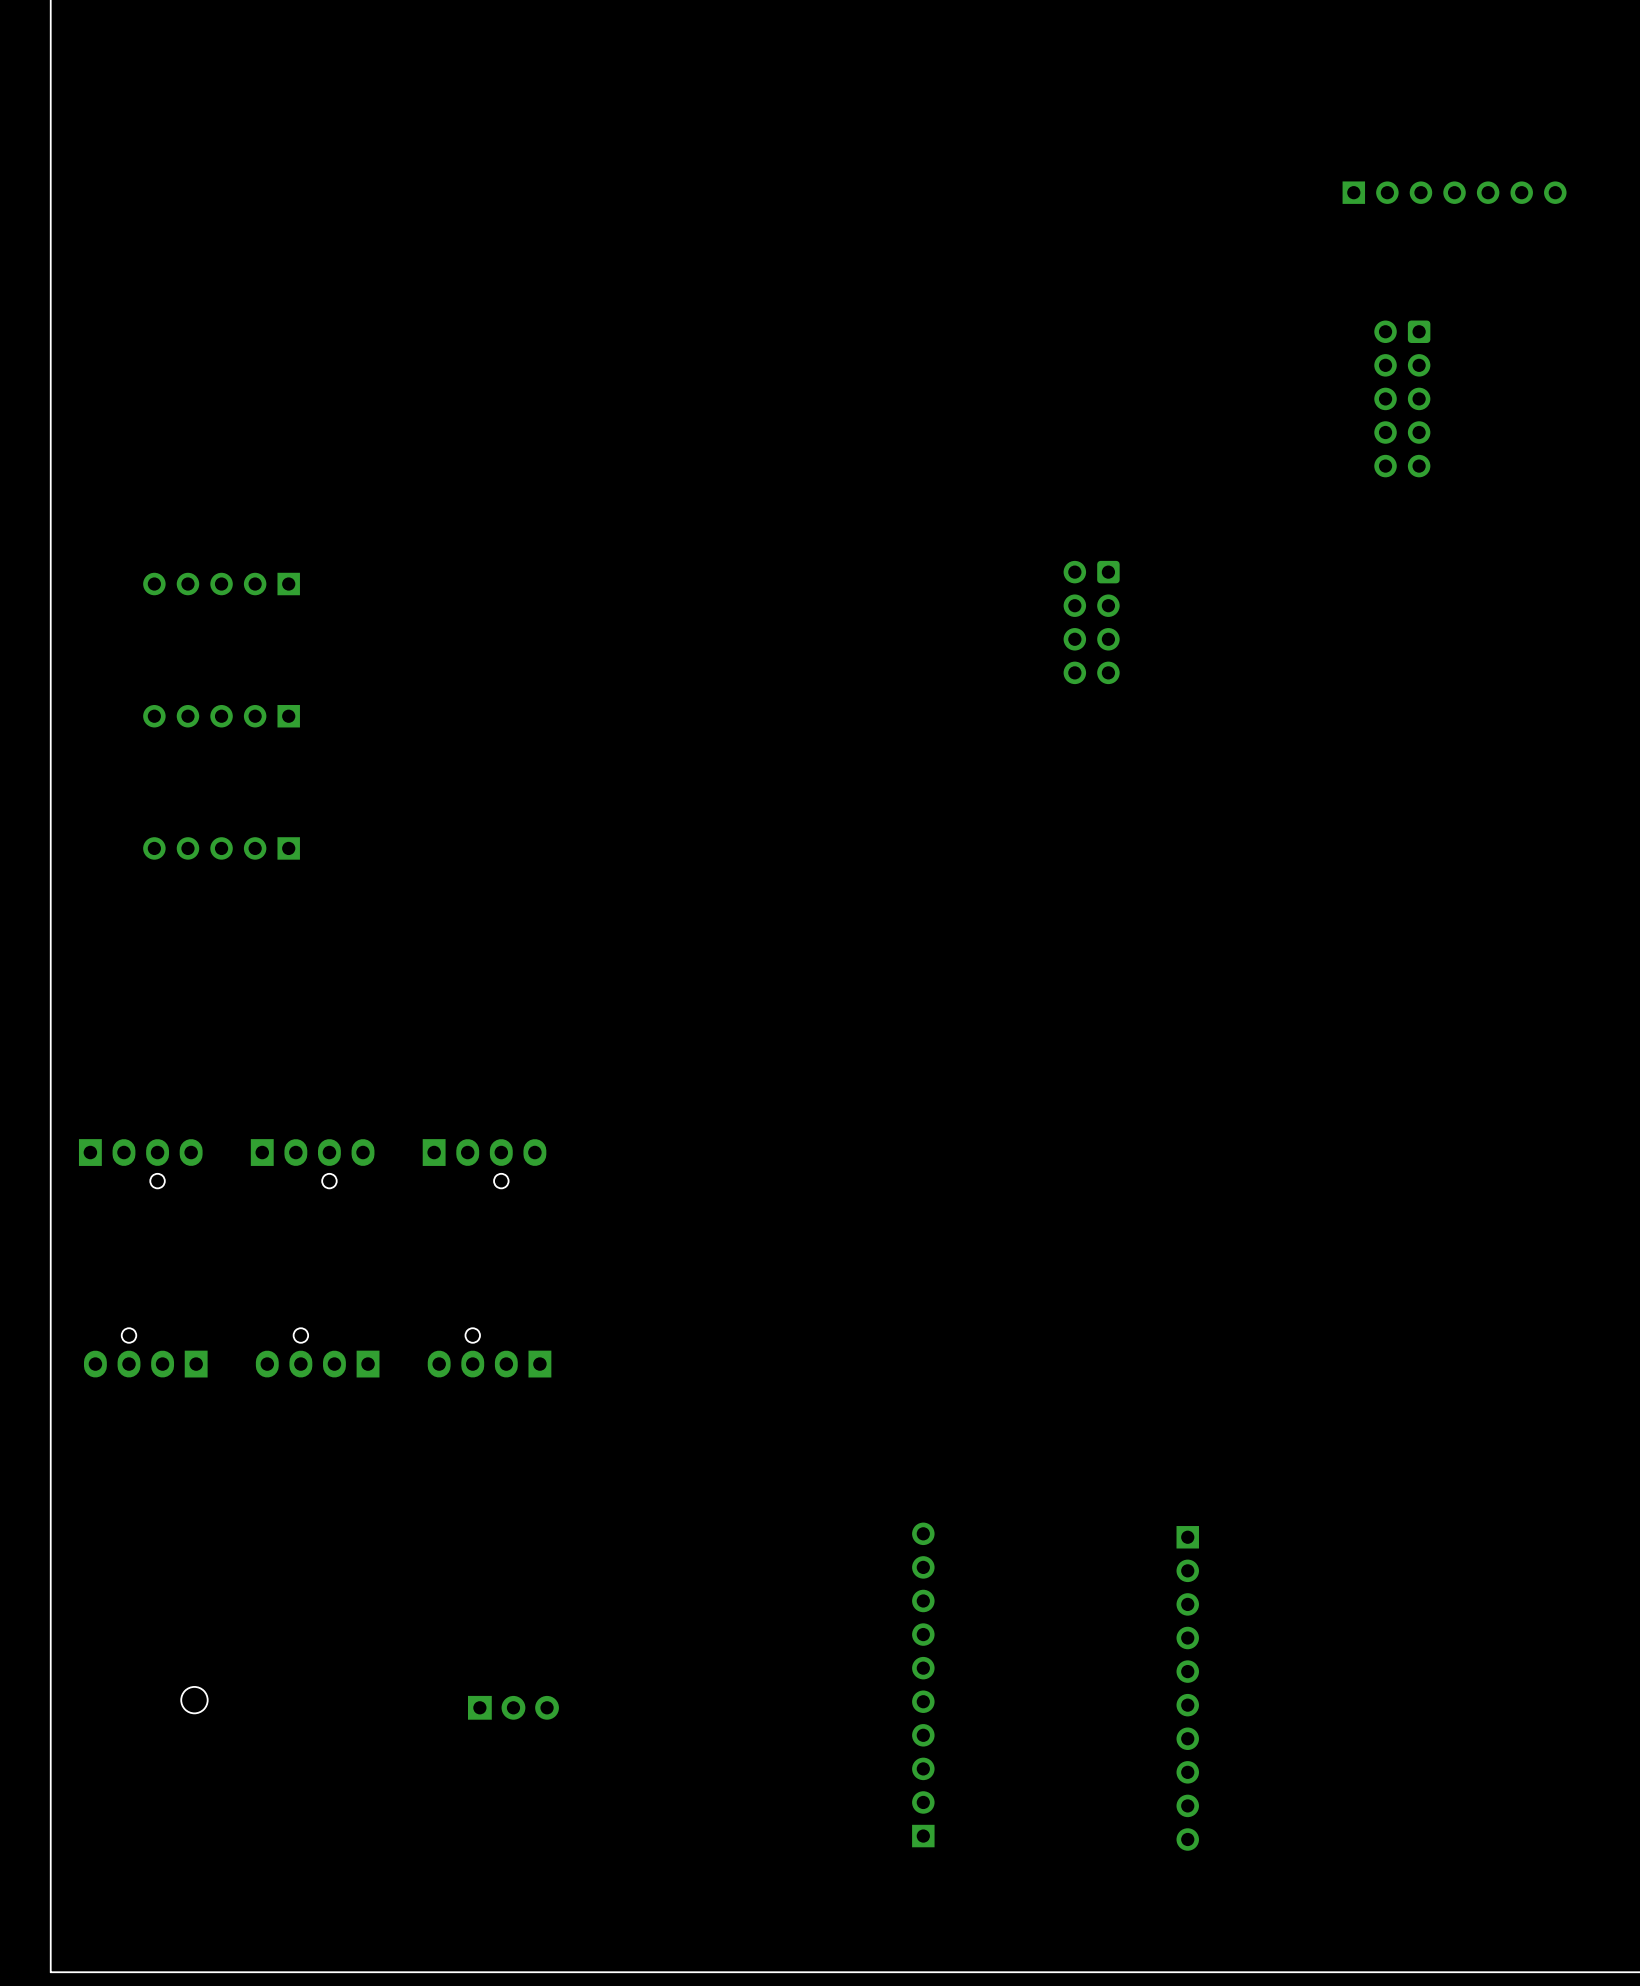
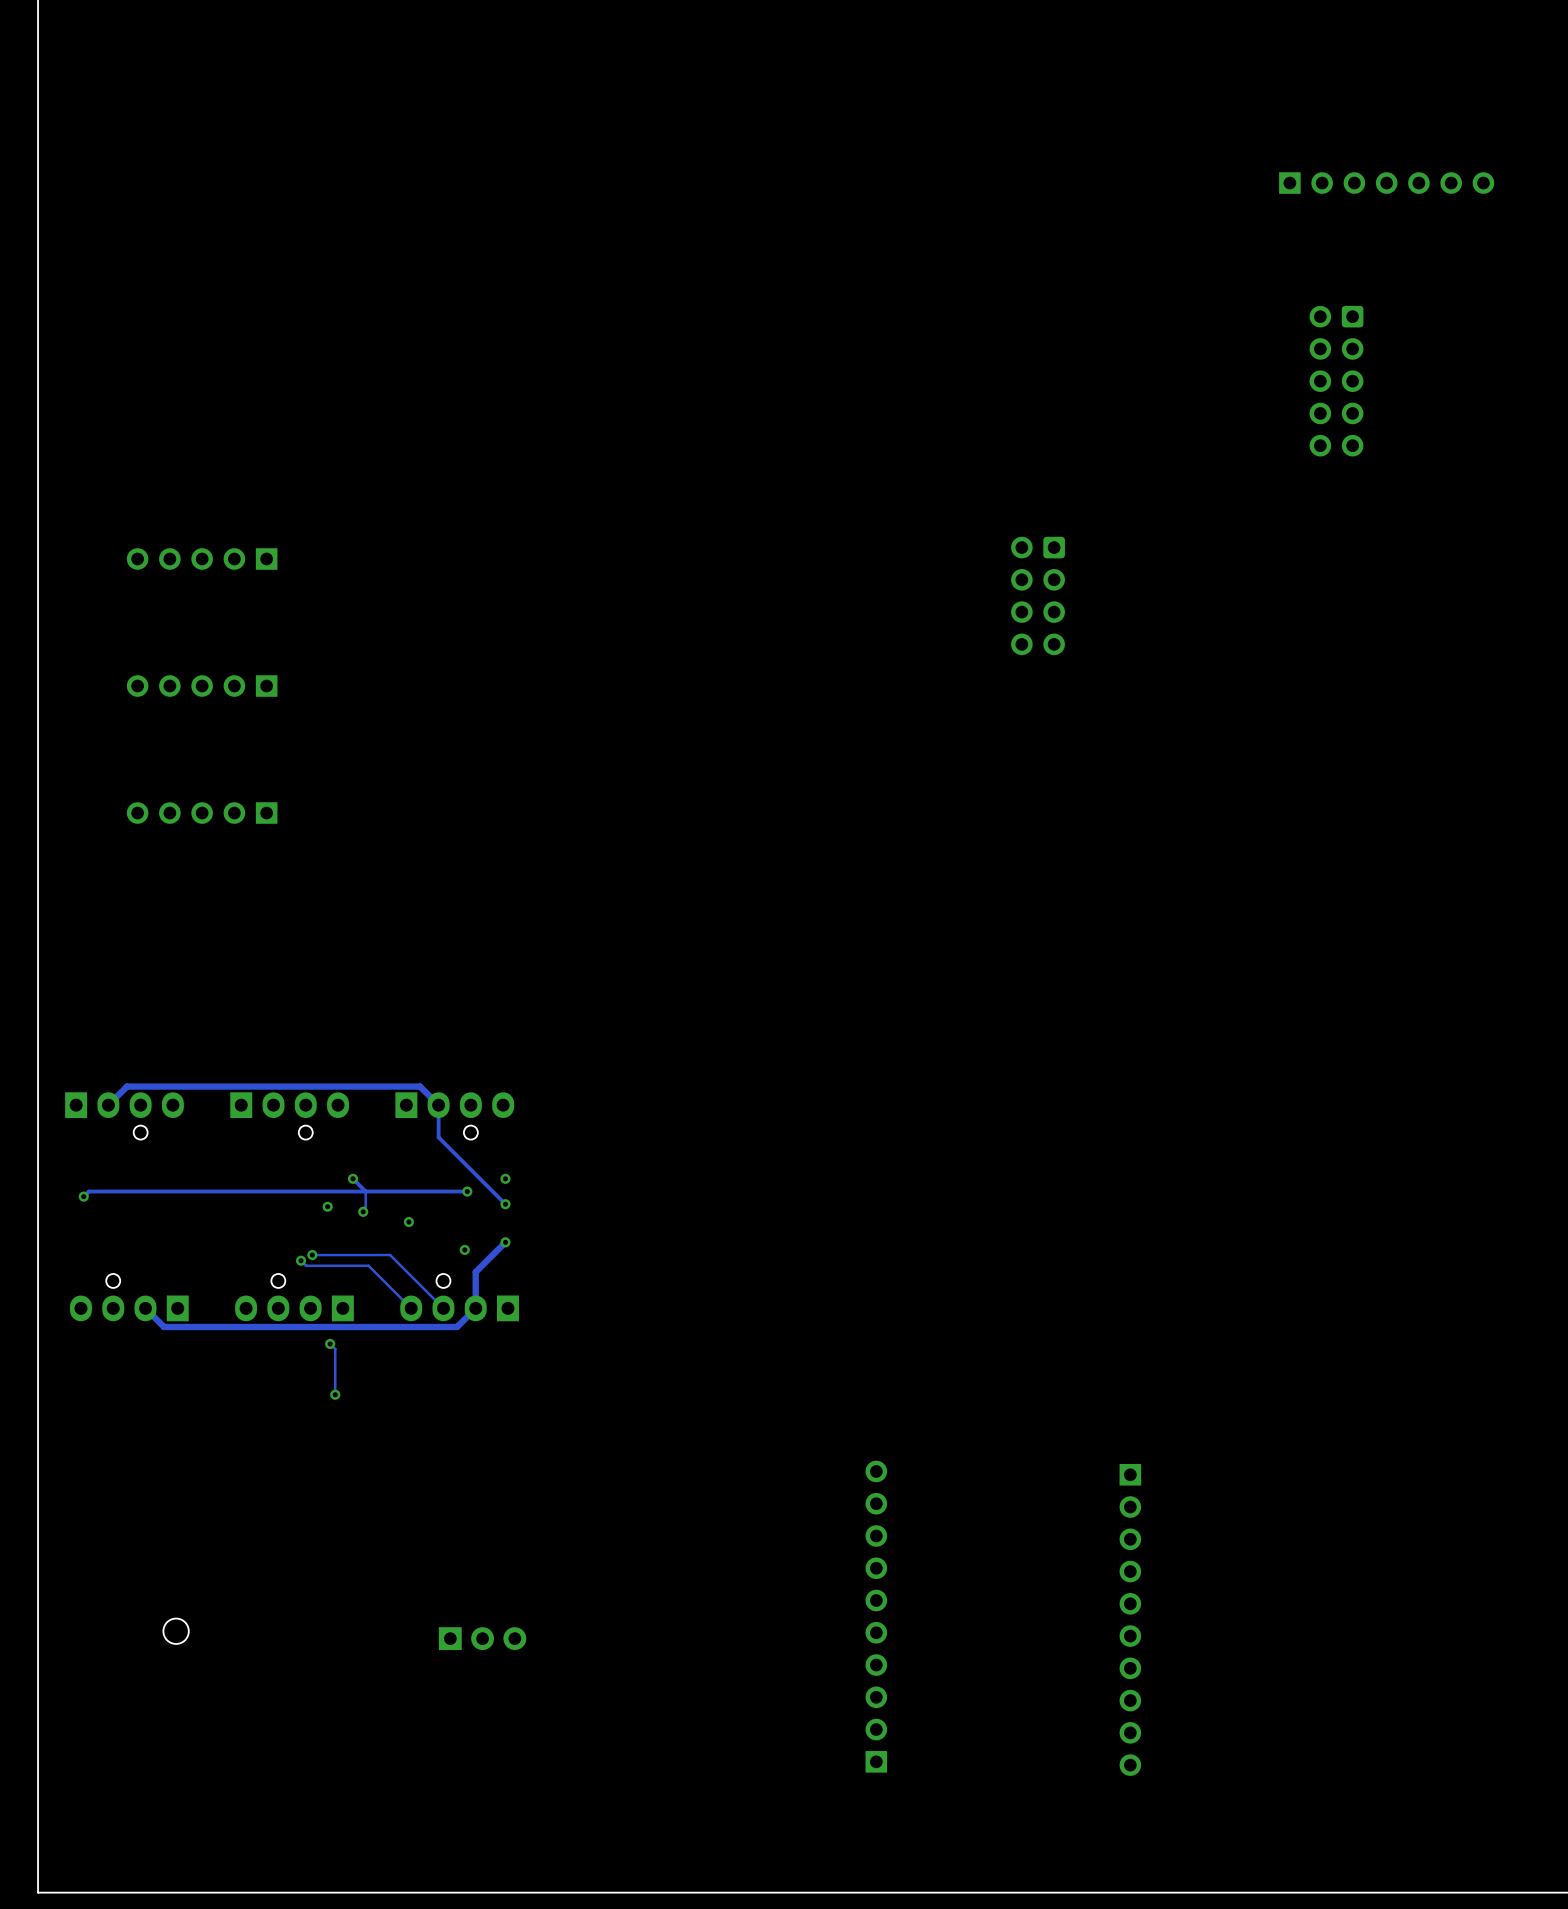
track: none -> (108, 1105) (127, 1086) (420, 1086) (438, 1105) (438, 1137) (505, 1204)
track: none -> (353, 1178) (365, 1191) (365, 1206) (363, 1209)
via: none -> (353, 1178)
via: none -> (505, 1178)
track: none -> (467, 1191) (88, 1191) (83, 1196)
via: none -> (467, 1191)
via: none -> (83, 1196)
via: none -> (505, 1204)
via: none -> (327, 1206)
via: none -> (363, 1211)
via: none -> (408, 1222)
track: none -> (505, 1242) (475, 1272) (475, 1308) (457, 1326) (164, 1326) (145, 1308)
via: none -> (505, 1242)
via: none -> (464, 1249)
track: none -> (312, 1255) (390, 1255) (443, 1308)
via: none -> (312, 1255)
track: none -> (301, 1260) (306, 1265) (368, 1265) (411, 1308)
via: none -> (301, 1260)
track: none -> (330, 1343) (335, 1349) (335, 1394)
via: none -> (330, 1343)
via: none -> (335, 1394)

